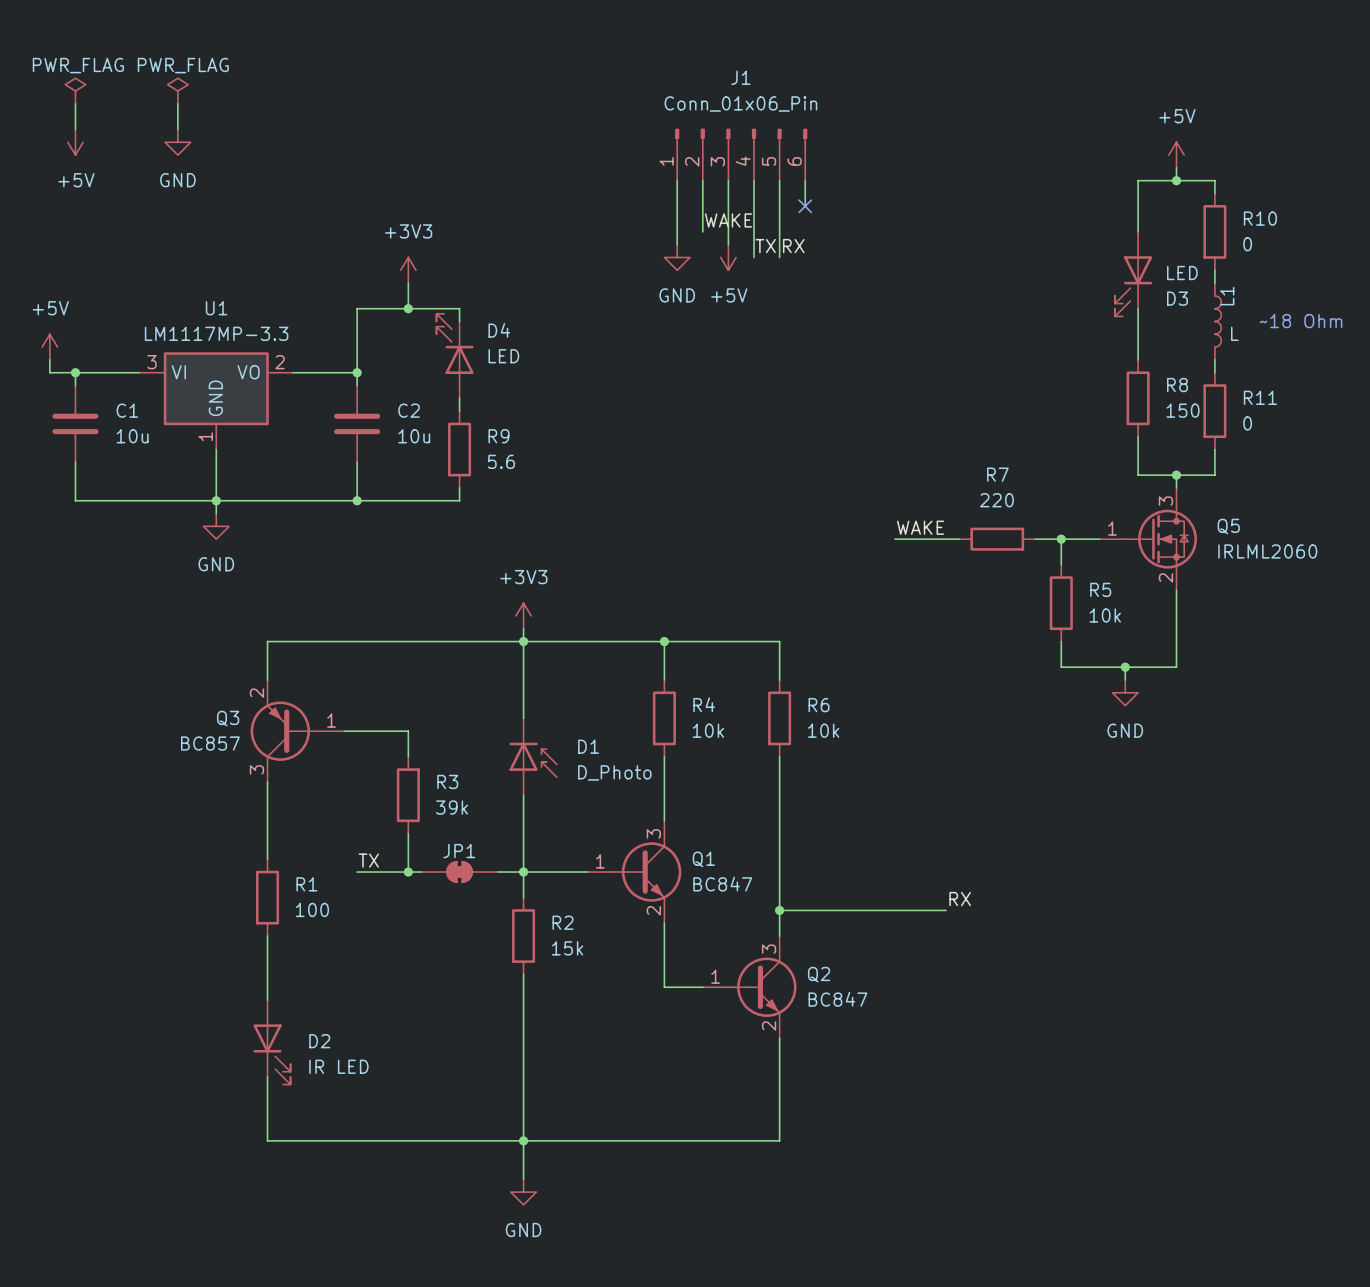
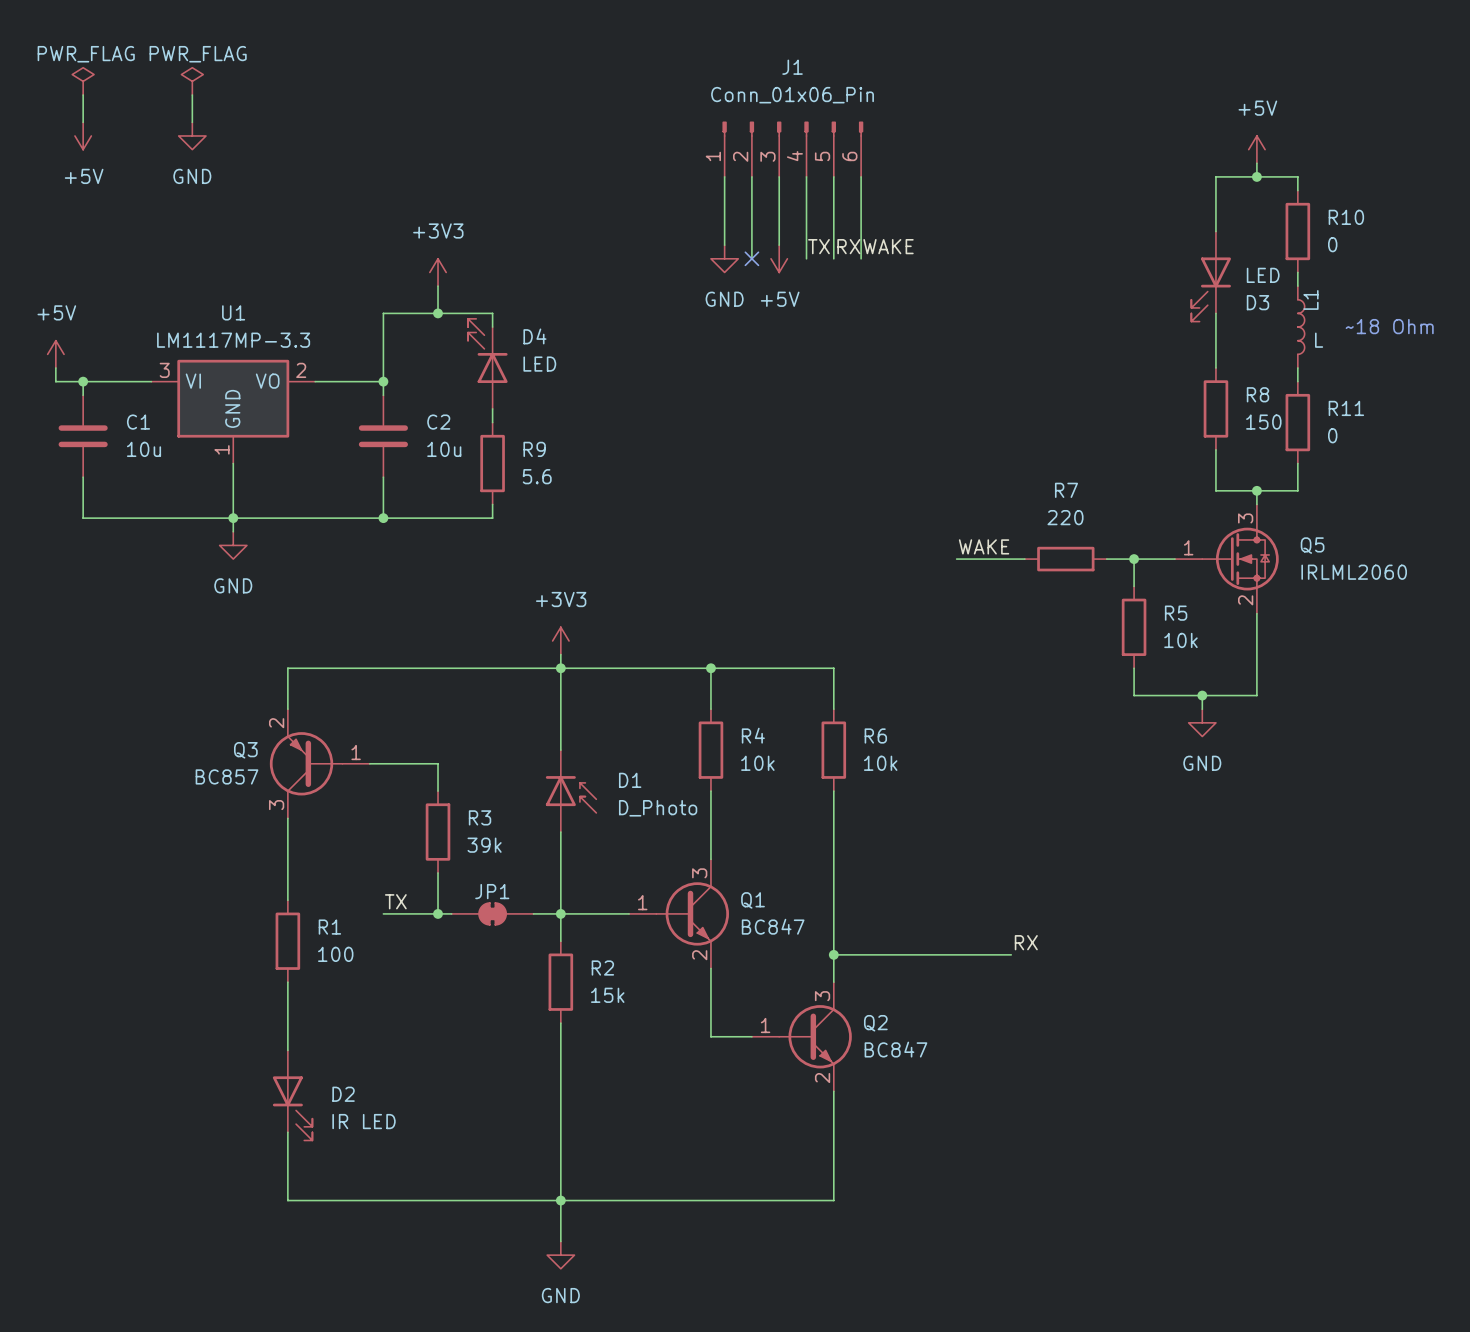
wire: none -> (861, 204) (861, 258)
no-connect mark: (805, 206) -> none
label position: WAKE (728, 220) -> WAKE (888, 246)
wire: none -> (751, 231) (751, 258)
no-connect mark: none -> (751, 258)

